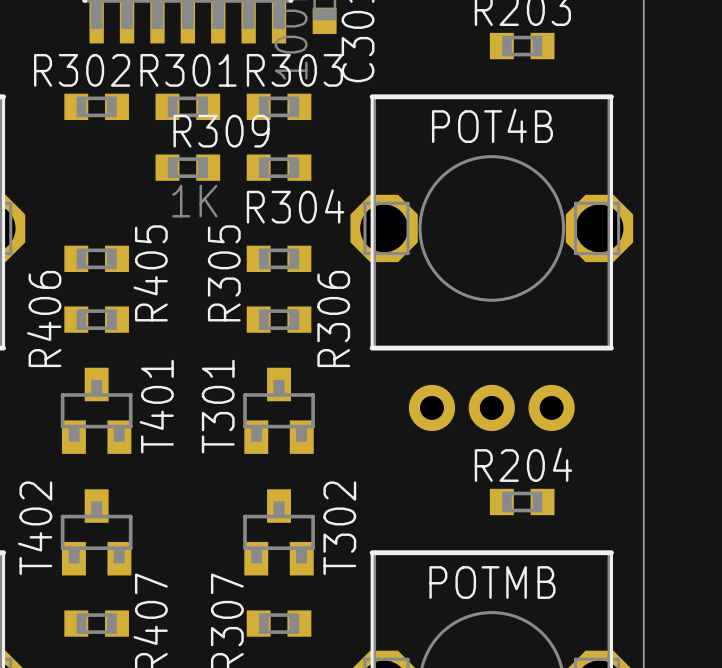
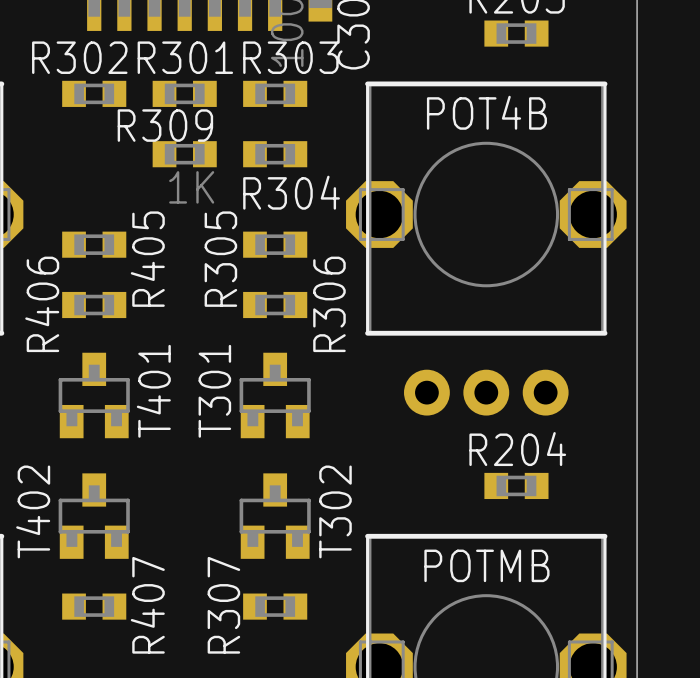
R309 name position: R309 (221, 131) -> R309 (165, 125)

